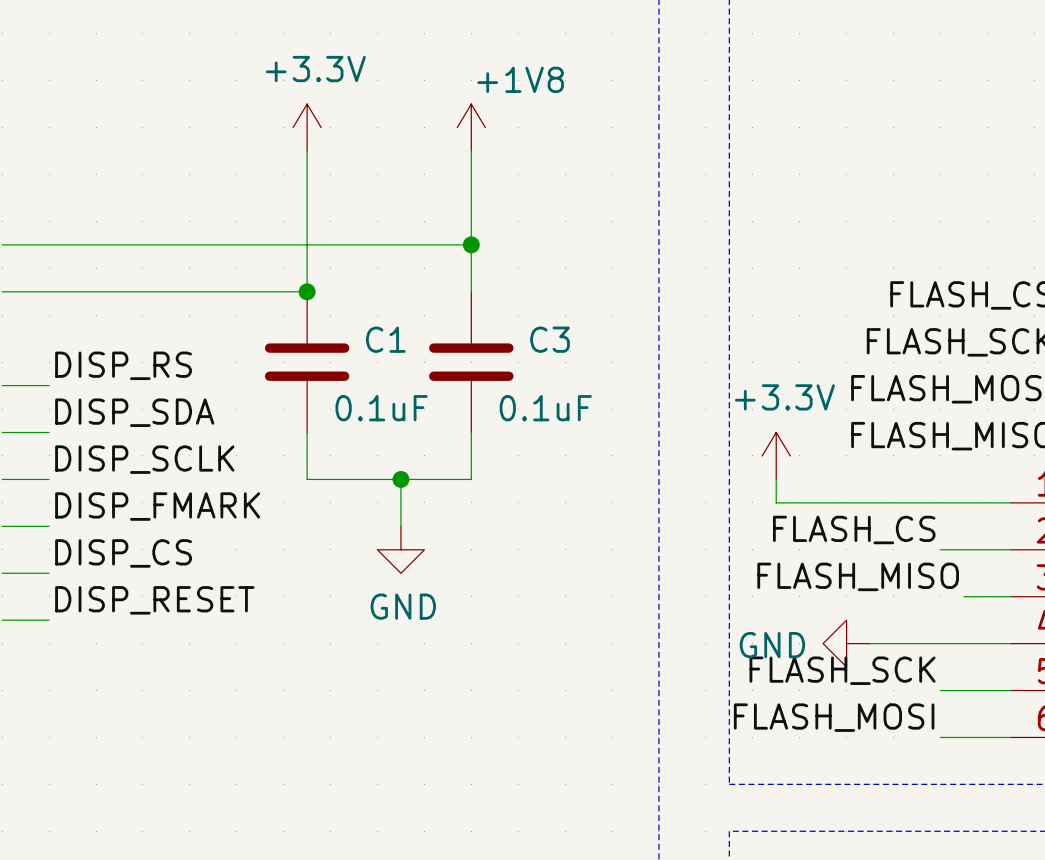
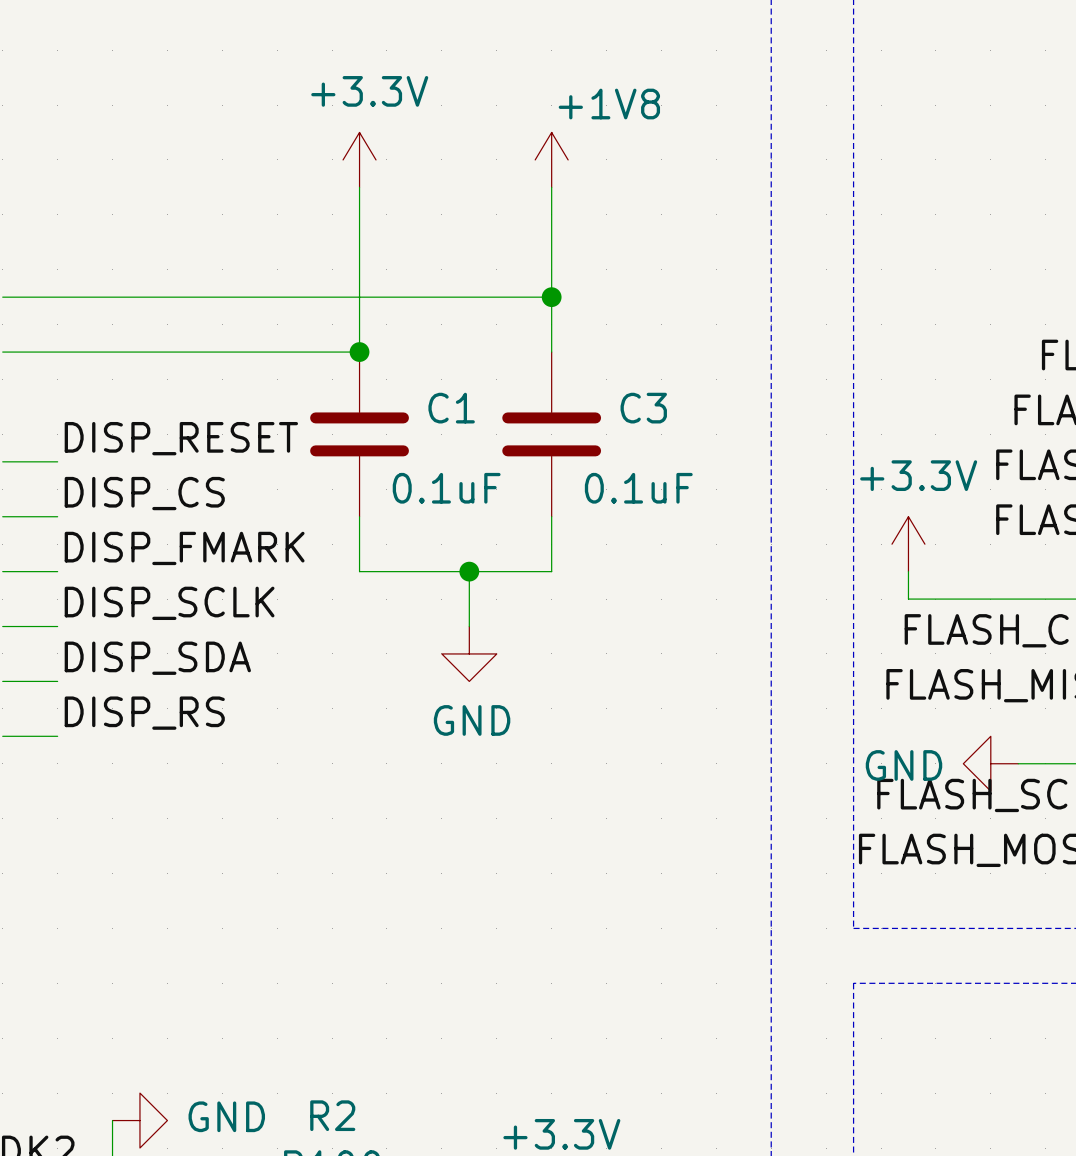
label: DISP_RS (123, 365) -> DISP_RESET (181, 438)
label: DISP_SDA (134, 412) -> DISP_CS (144, 493)
label: DISP_SCLK (144, 459) -> DISP_FMARK (184, 548)
label: DISP_FMARK (157, 506) -> DISP_SCLK (169, 603)
label: DISP_CS (123, 553) -> DISP_SDA (157, 658)
label: DISP_RESET (154, 600) -> DISP_RS (144, 713)

